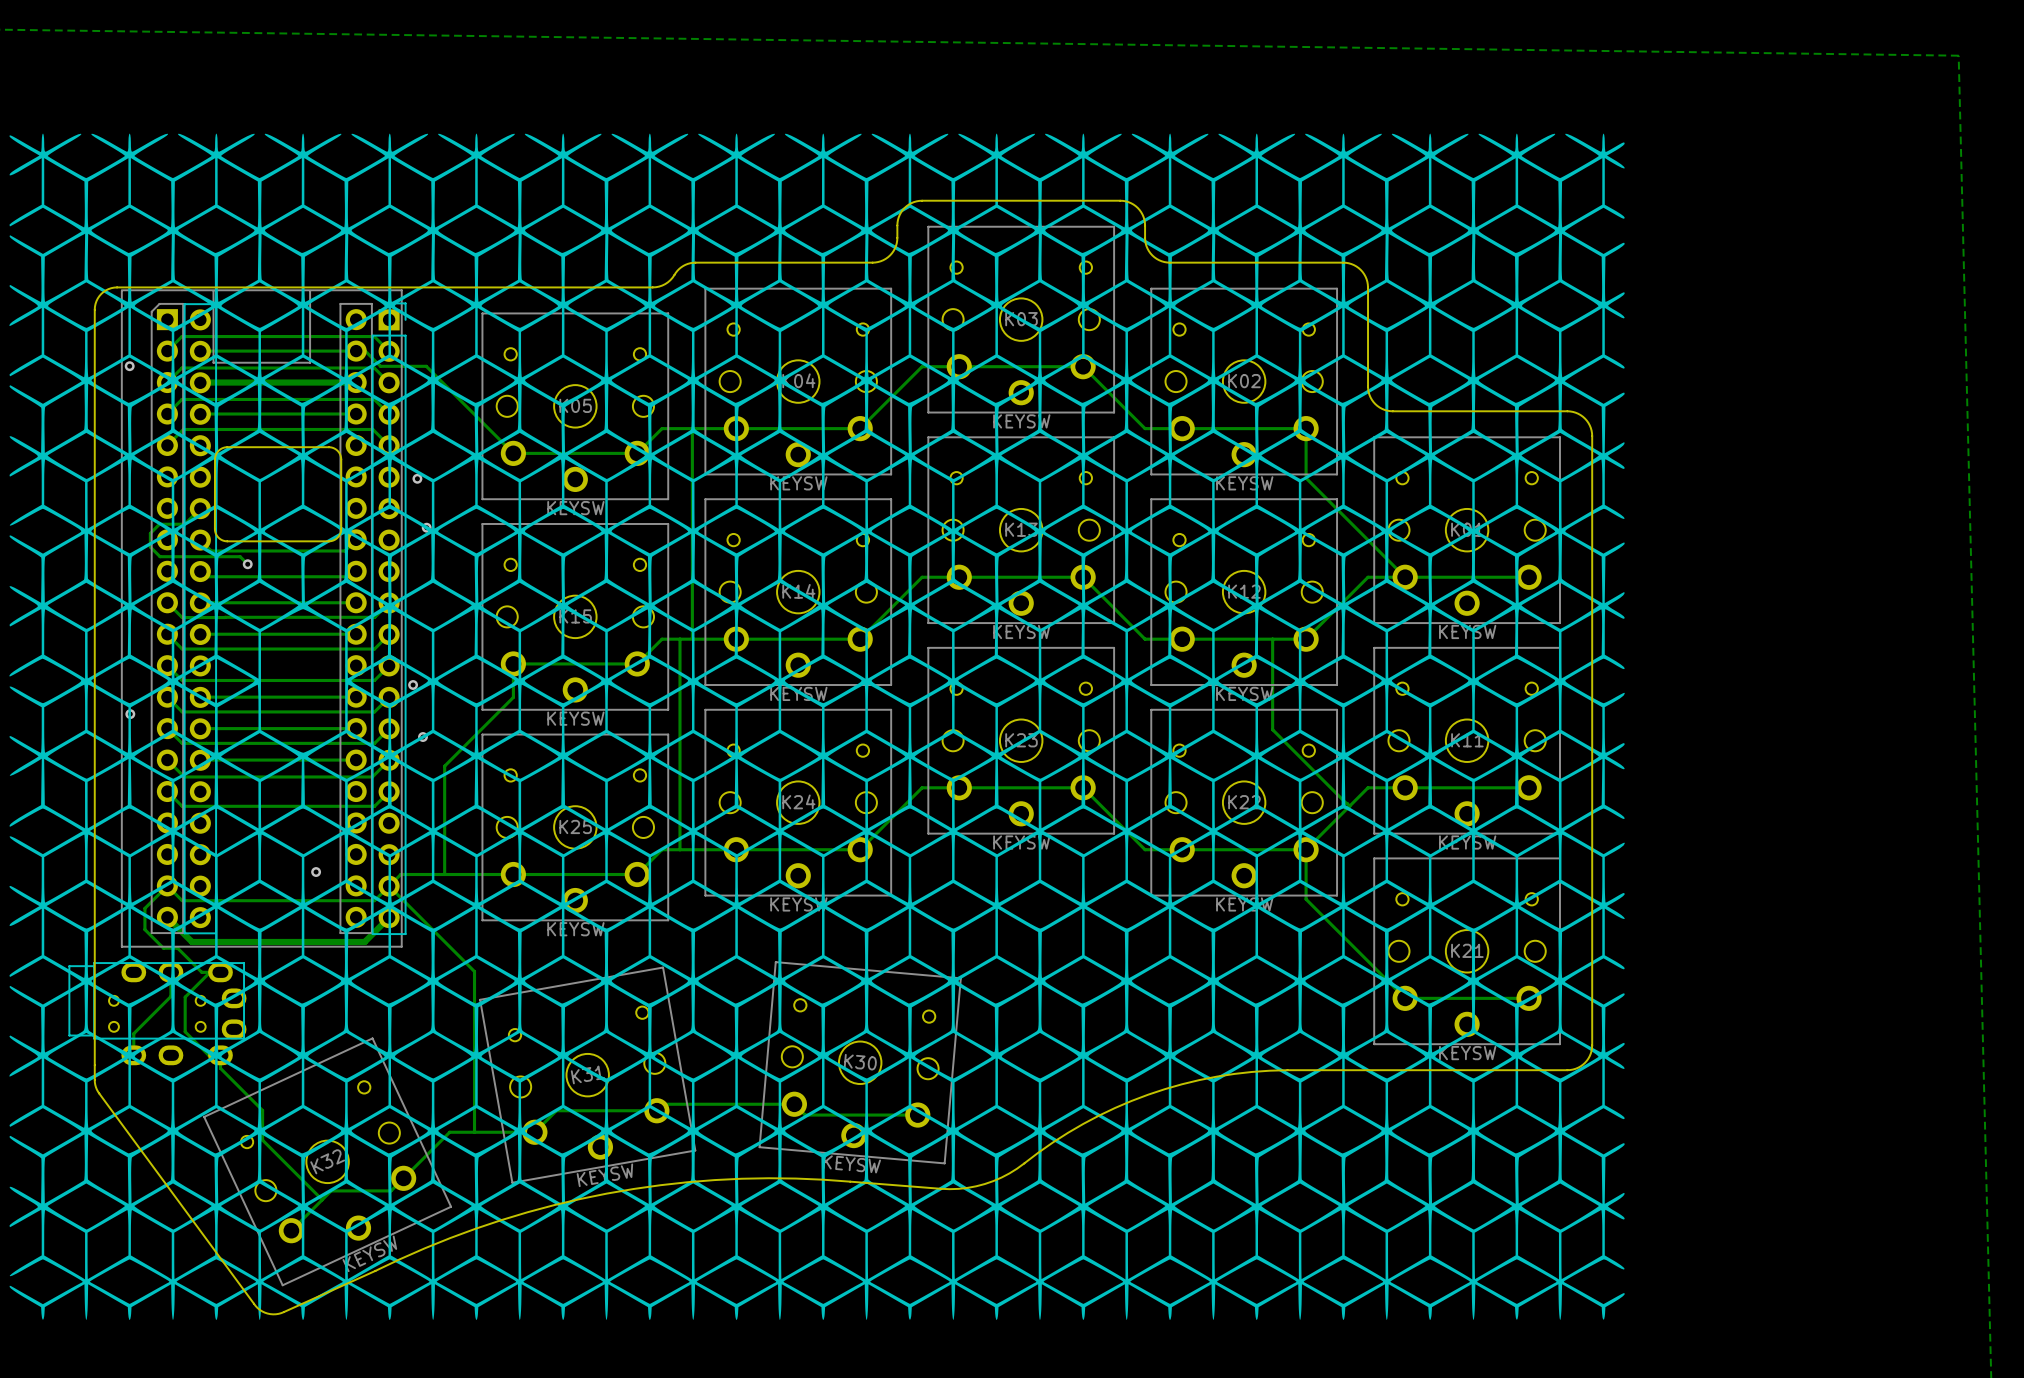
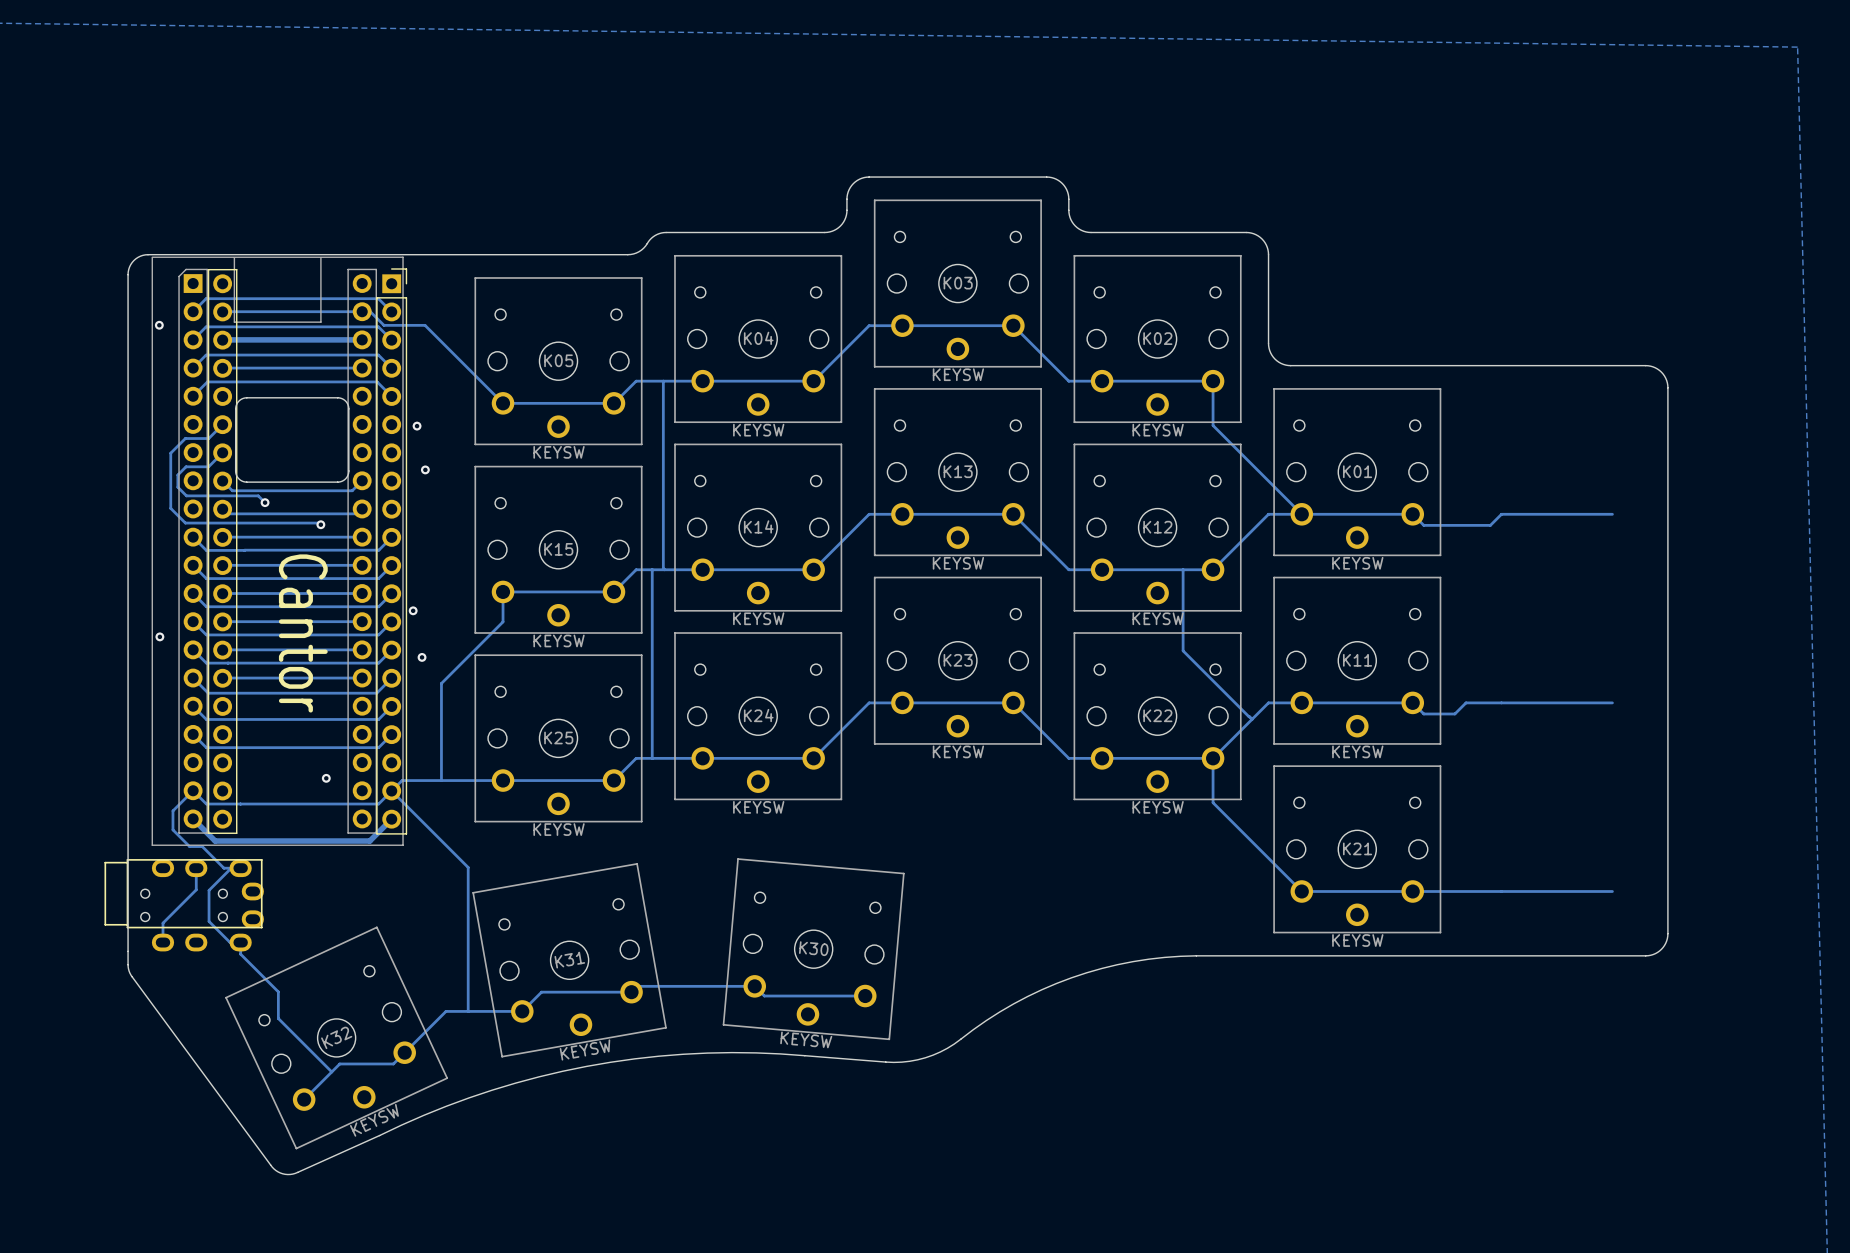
drawing: [9, 133, 1625, 1321] -> none
board edge: (1567, 411) (1575, 412) (1584, 418) (1589, 425) (1592, 436) (1592, 1045) (1589, 1056) (1584, 1062) (1575, 1068) (1567, 1070) -> (1447, 365) (1648, 365) (1655, 367) (1663, 373) (1667, 387) (1666, 940) (1659, 951) (1648, 955) (1447, 955)
track: none -> (222, 424) (208, 438) (185, 438) (170, 453) (170, 508) (185, 523) (319, 523) (320, 524)
track: none -> (1612, 514) (1501, 514) (1490, 525) (1423, 525) (1412, 514)
via: none -> (320, 524)
track: none -> (362, 593) (222, 593)
text: none -> Cantor (303, 633)
track: none -> (1612, 702) (1466, 702) (1454, 713) (1423, 713) (1412, 702)
track: none -> (193, 734) (206, 747) (378, 747) (391, 734)
track: none -> (1612, 891) (1412, 891)

